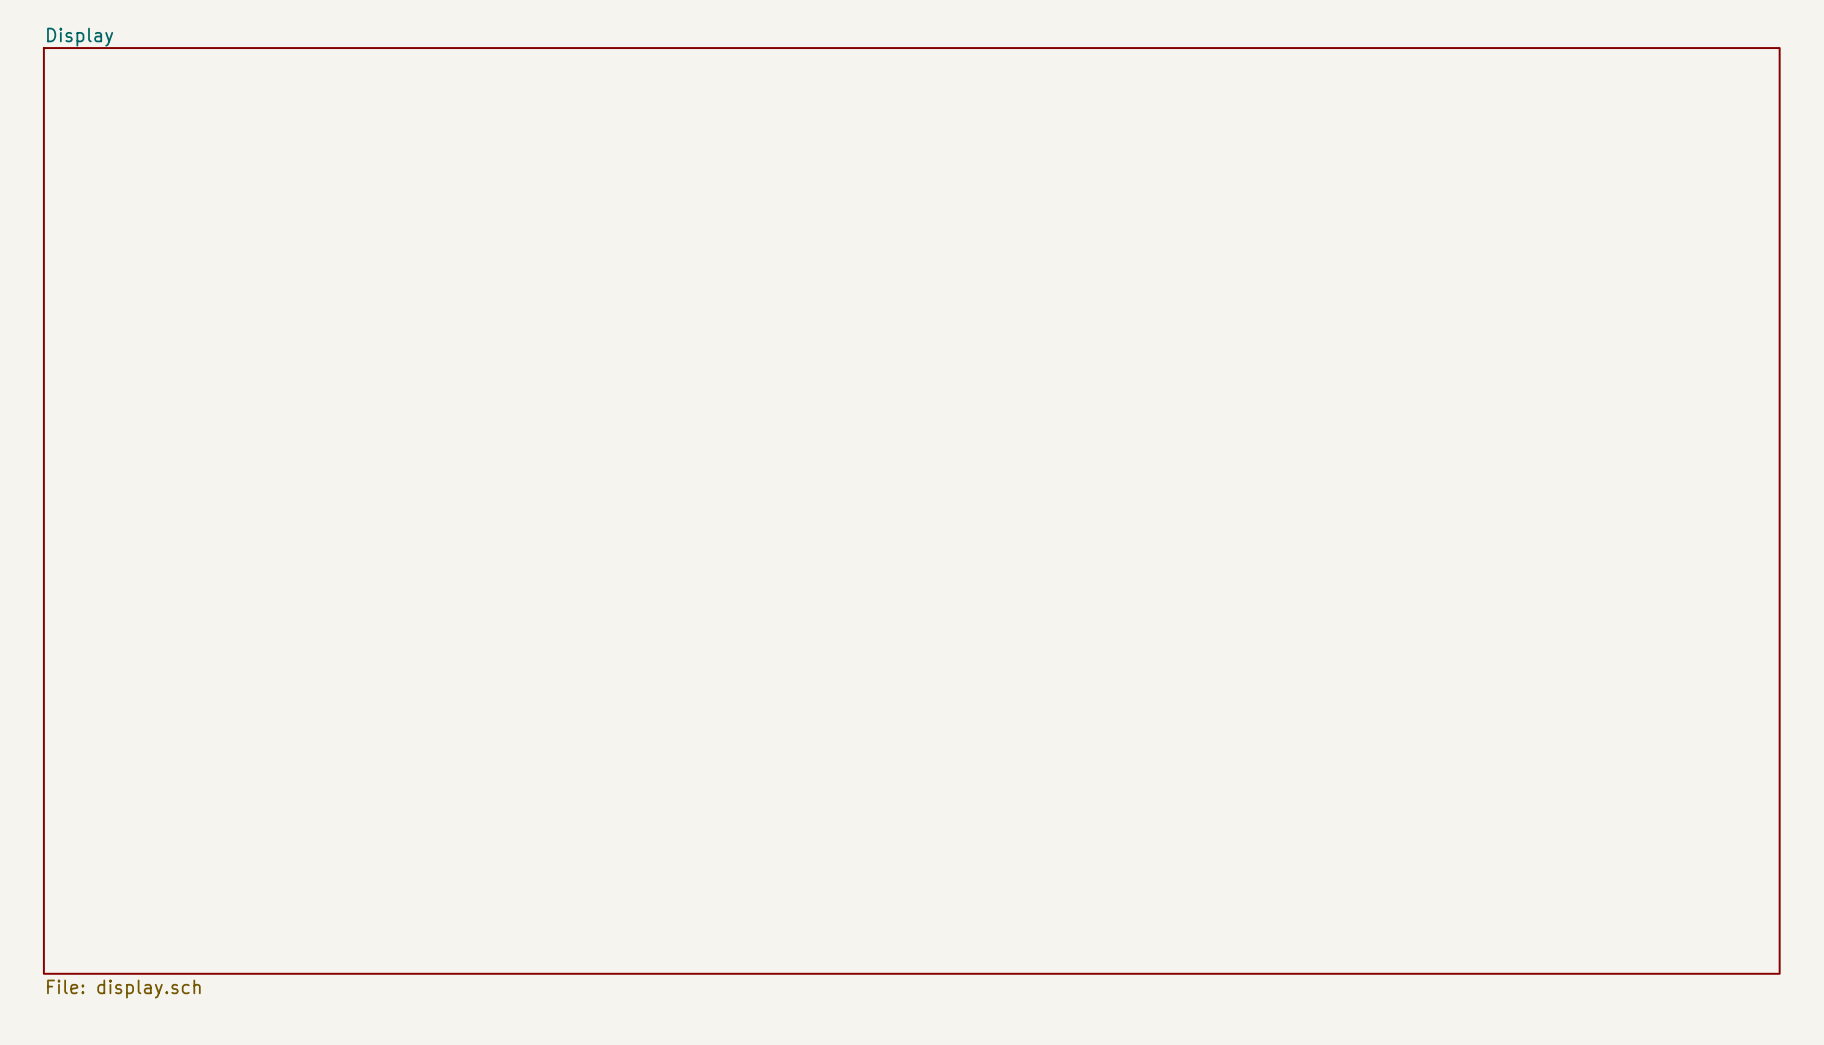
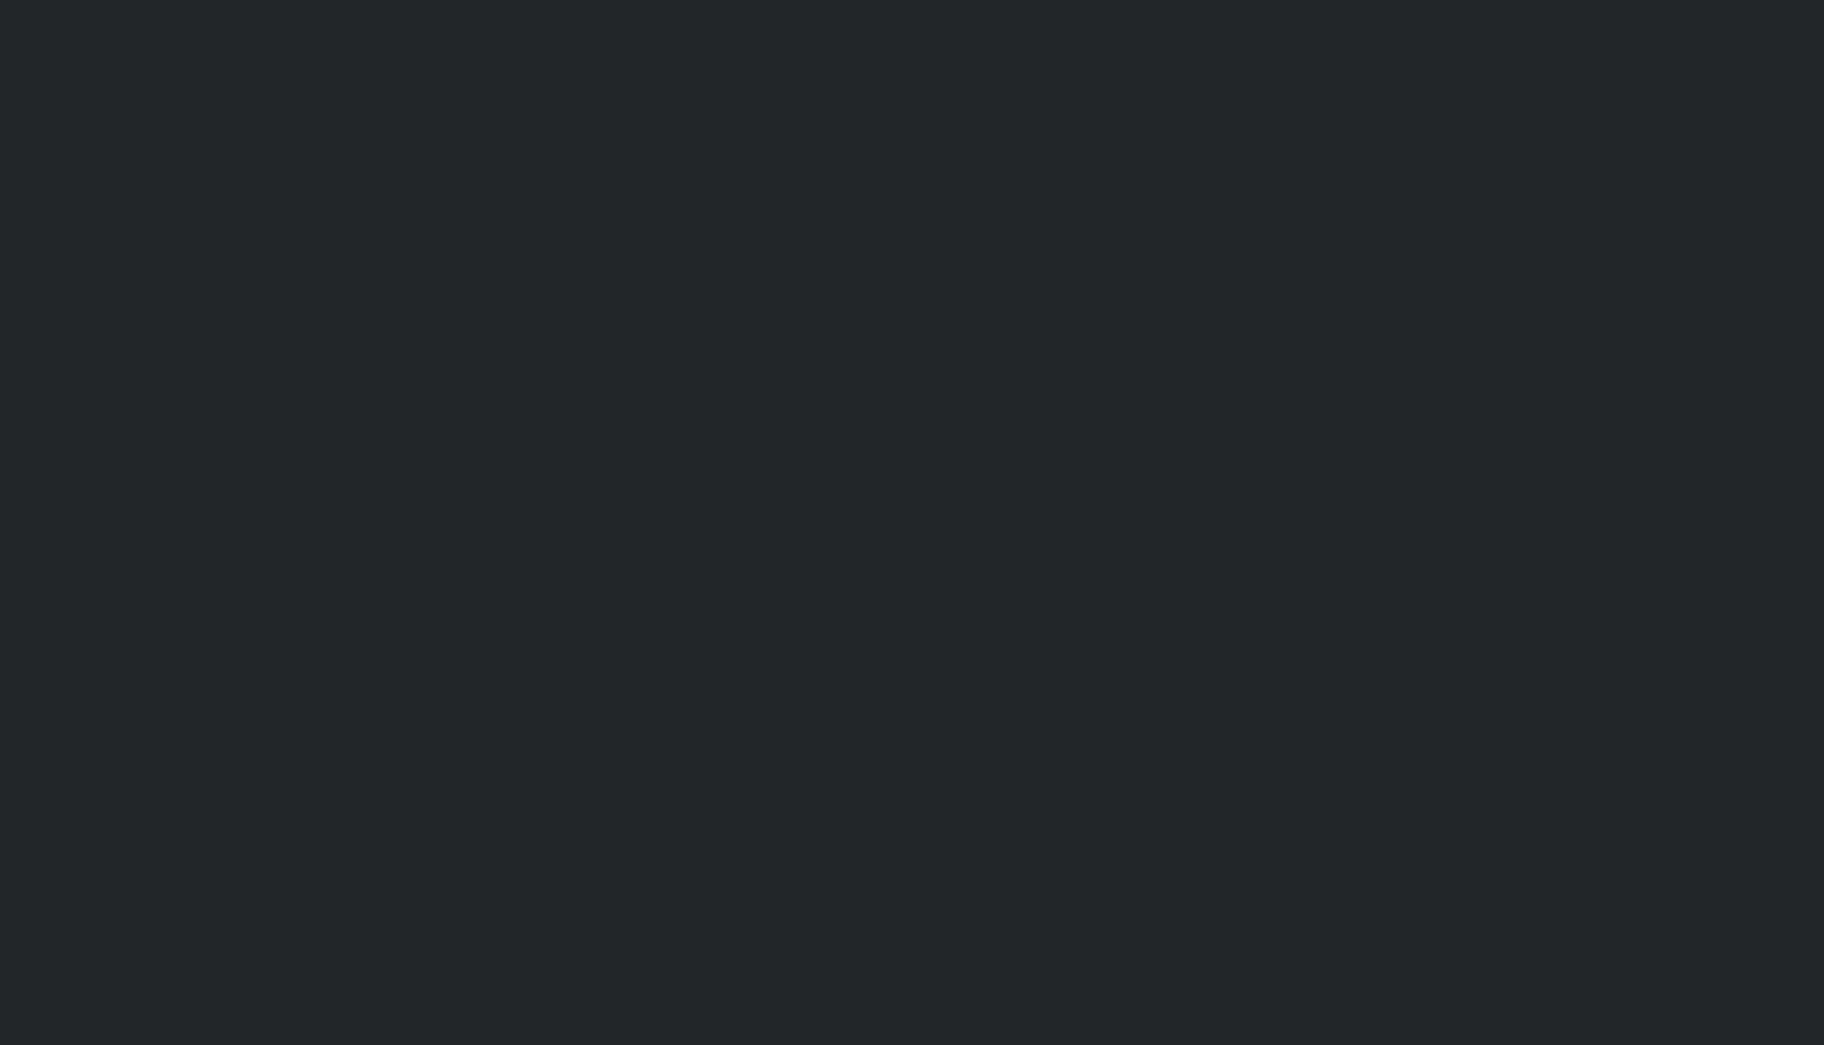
sheet Display: File: display.sch (911, 510) -> none

